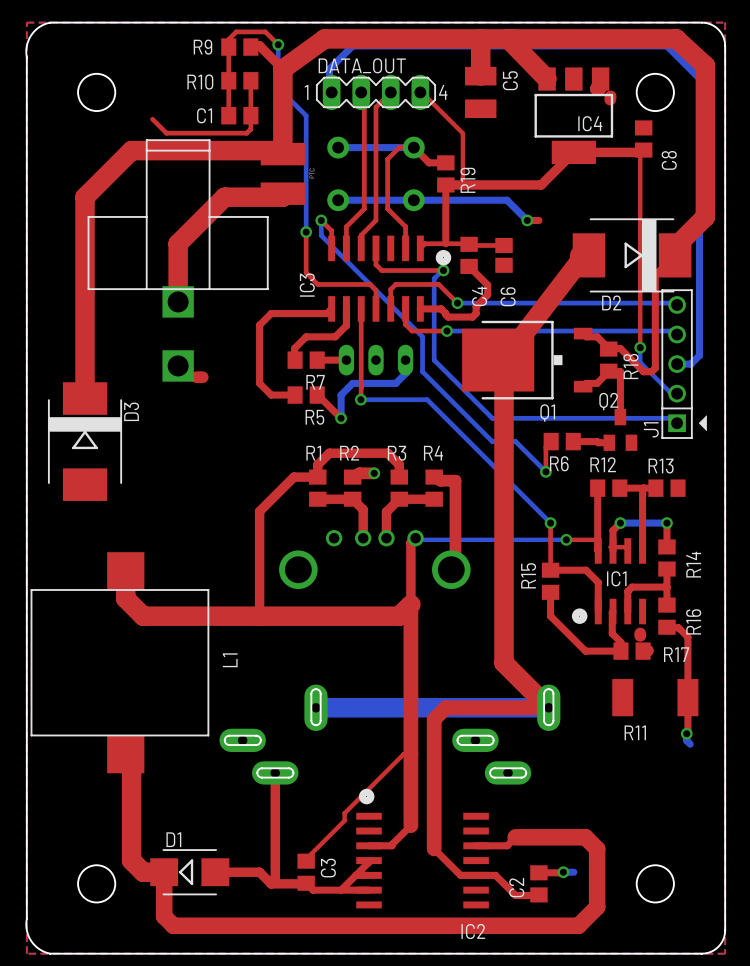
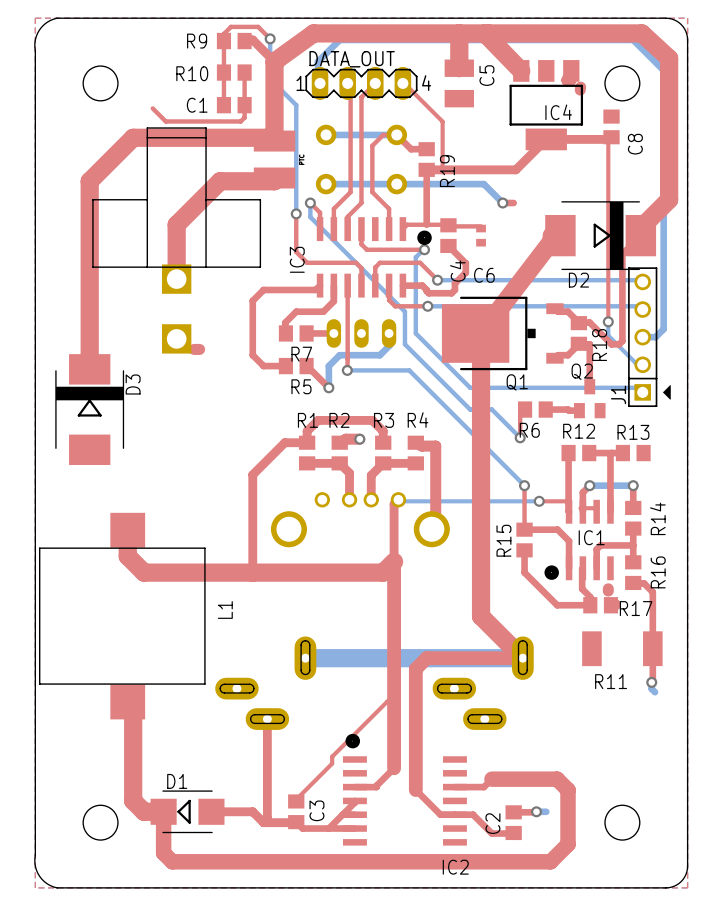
C6 footprint: [495, 237, 513, 273] -> [476, 224, 486, 247]
C6 name rotation: 0° (508, 296) -> 90° clockwise (484, 275)

